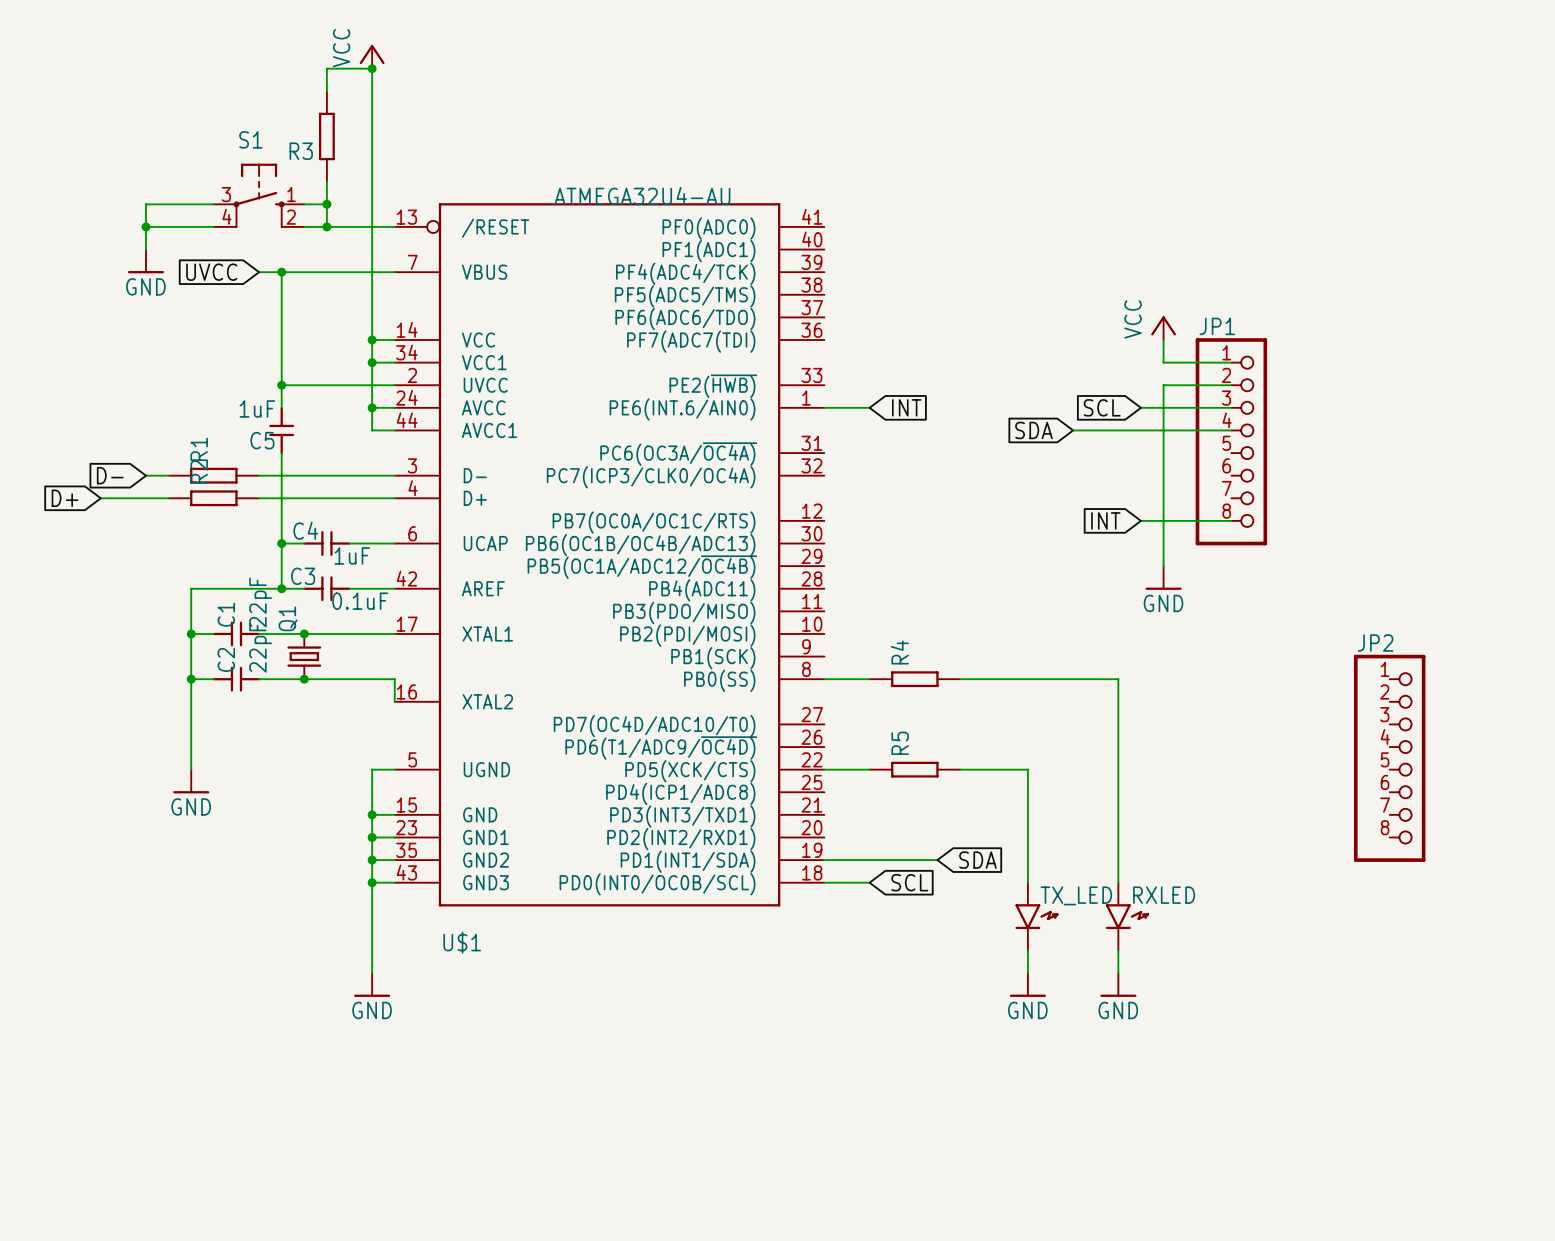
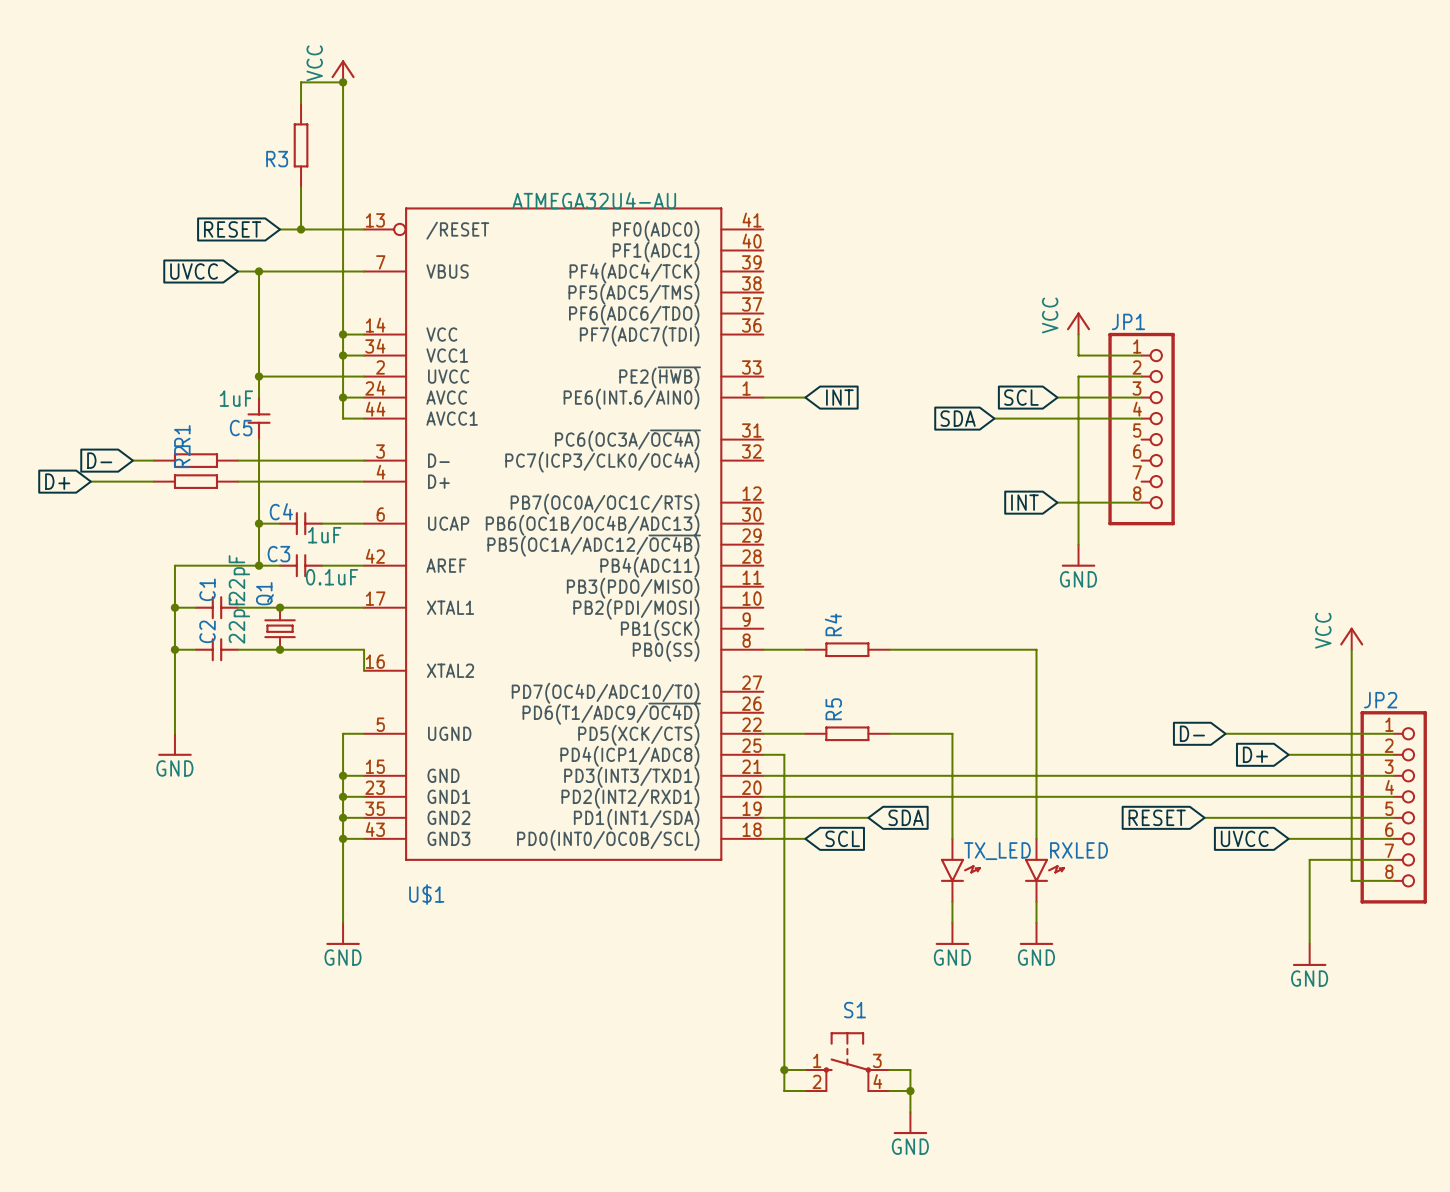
S1 flip: as is (259, 195) -> left-right (847, 1061)
S1 position: (259, 195) -> (847, 1061)
wire: (213, 204) (146, 204) (146, 249) -> none
wire: (304, 204) (326, 204) -> none
junction: (326, 204) -> none
wire: (146, 226) (213, 226) -> none
junction: (146, 226) -> none
global label: none -> RESET (232, 229)
power symbol: GND (146, 261) -> none
power symbol: none -> VCC (1351, 638)
wire: none -> (1351, 649) (1351, 880) (1393, 880)
JP2 position: (1389, 758) -> (1393, 807)
global label: none -> D- (1192, 733)
wire: none -> (1225, 733) (1393, 733)
wire: none -> (763, 754) (784, 754) (784, 1091) (805, 1091)
global label: none -> D+ (1255, 754)
wire: none -> (1288, 754) (1393, 754)
wire: none -> (763, 775) (1393, 775)
wire: none -> (763, 796) (1393, 796)
global label: none -> RESET (1157, 817)
wire: none -> (1204, 817) (1393, 817)
global label: none -> UVCC (1244, 838)
wire: none -> (1288, 838) (1393, 838)
wire: none -> (1393, 859) (1309, 859) (1309, 943)
power symbol: none -> GND (1309, 954)
wire: none -> (784, 1069) (805, 1069)
junction: none -> (784, 1069)
wire: none -> (889, 1069) (910, 1069) (910, 1112)
wire: none -> (889, 1091) (910, 1091)
junction: none -> (910, 1091)
power symbol: none -> GND (910, 1123)

